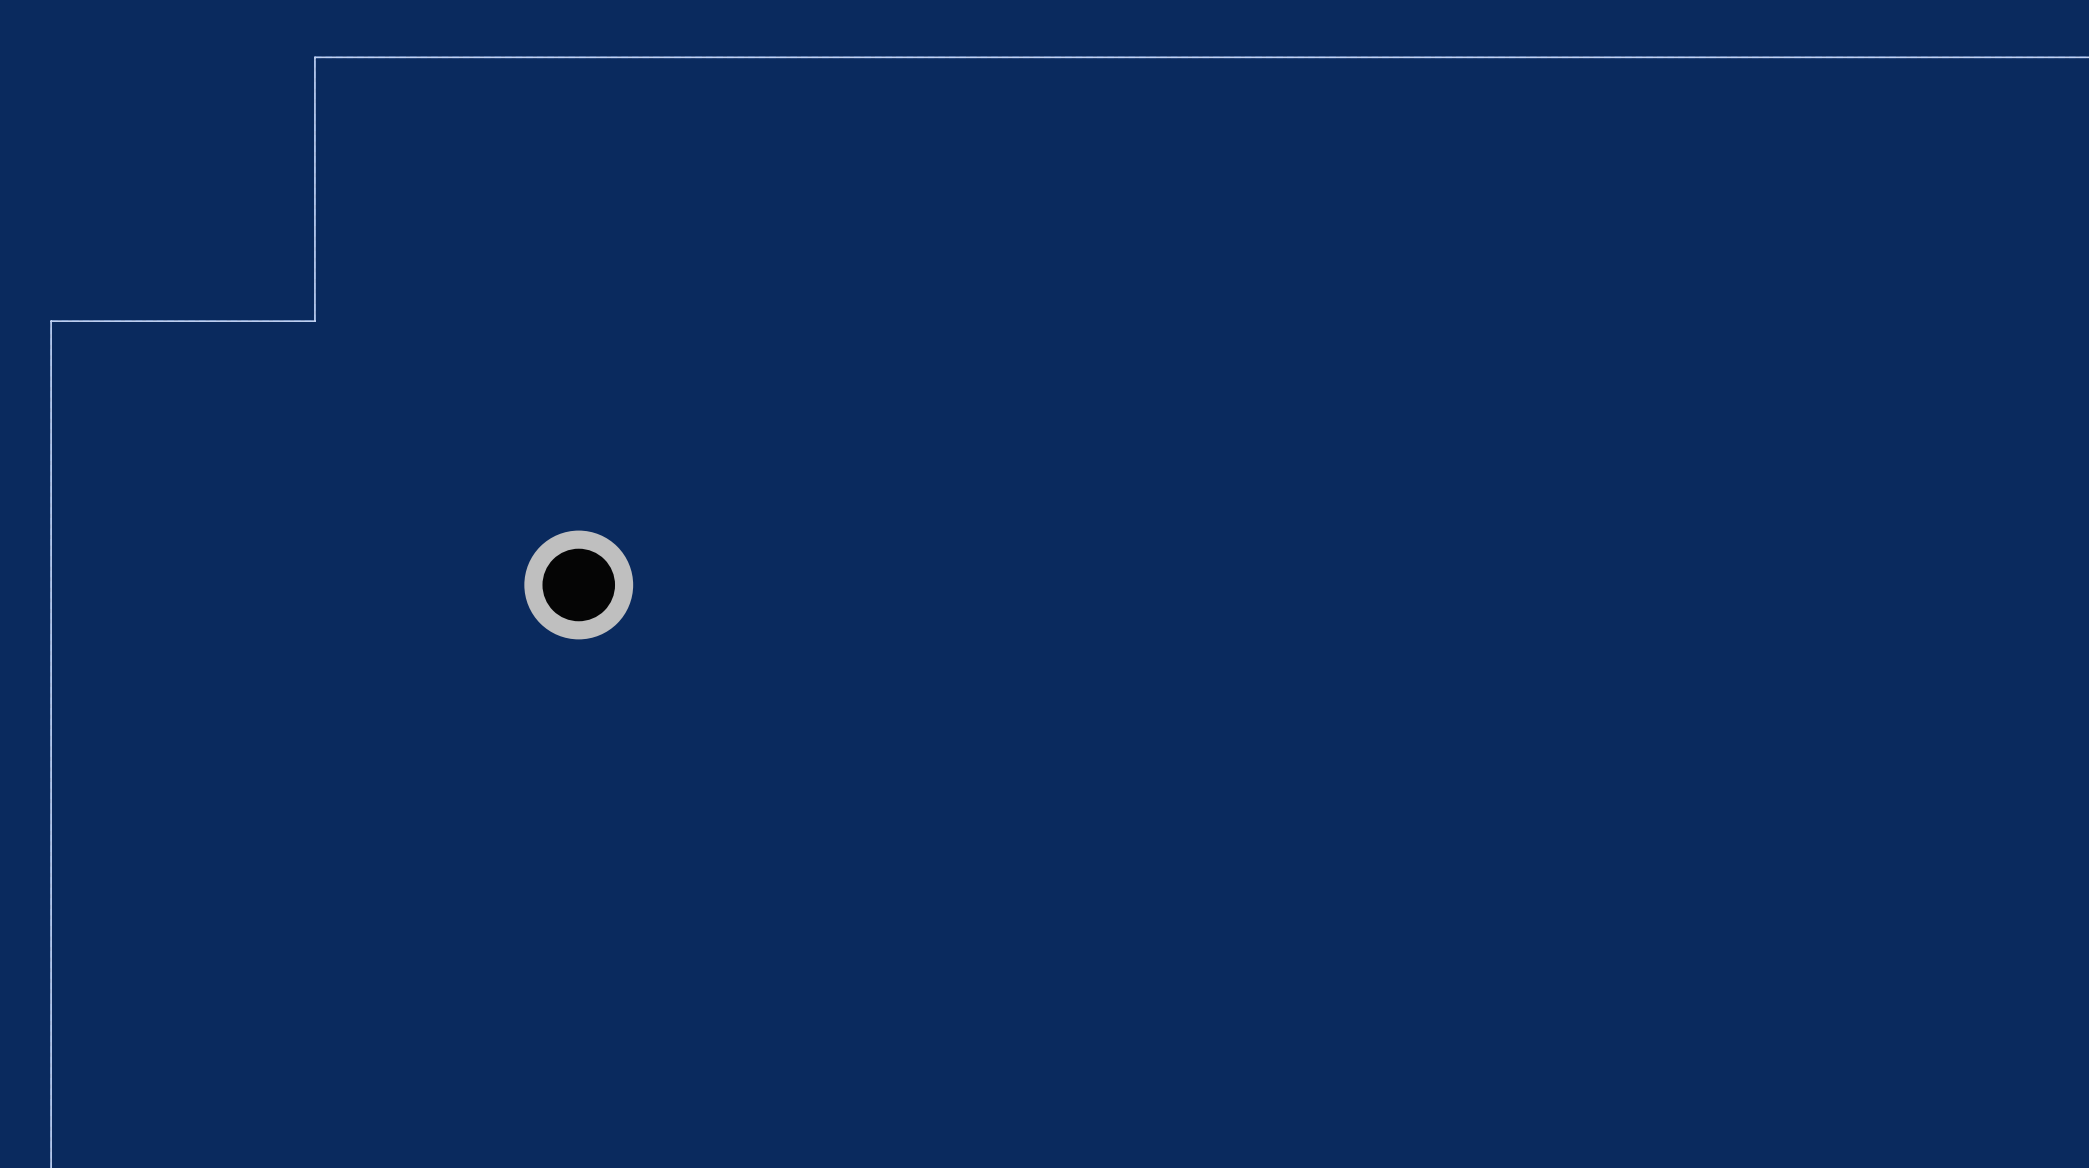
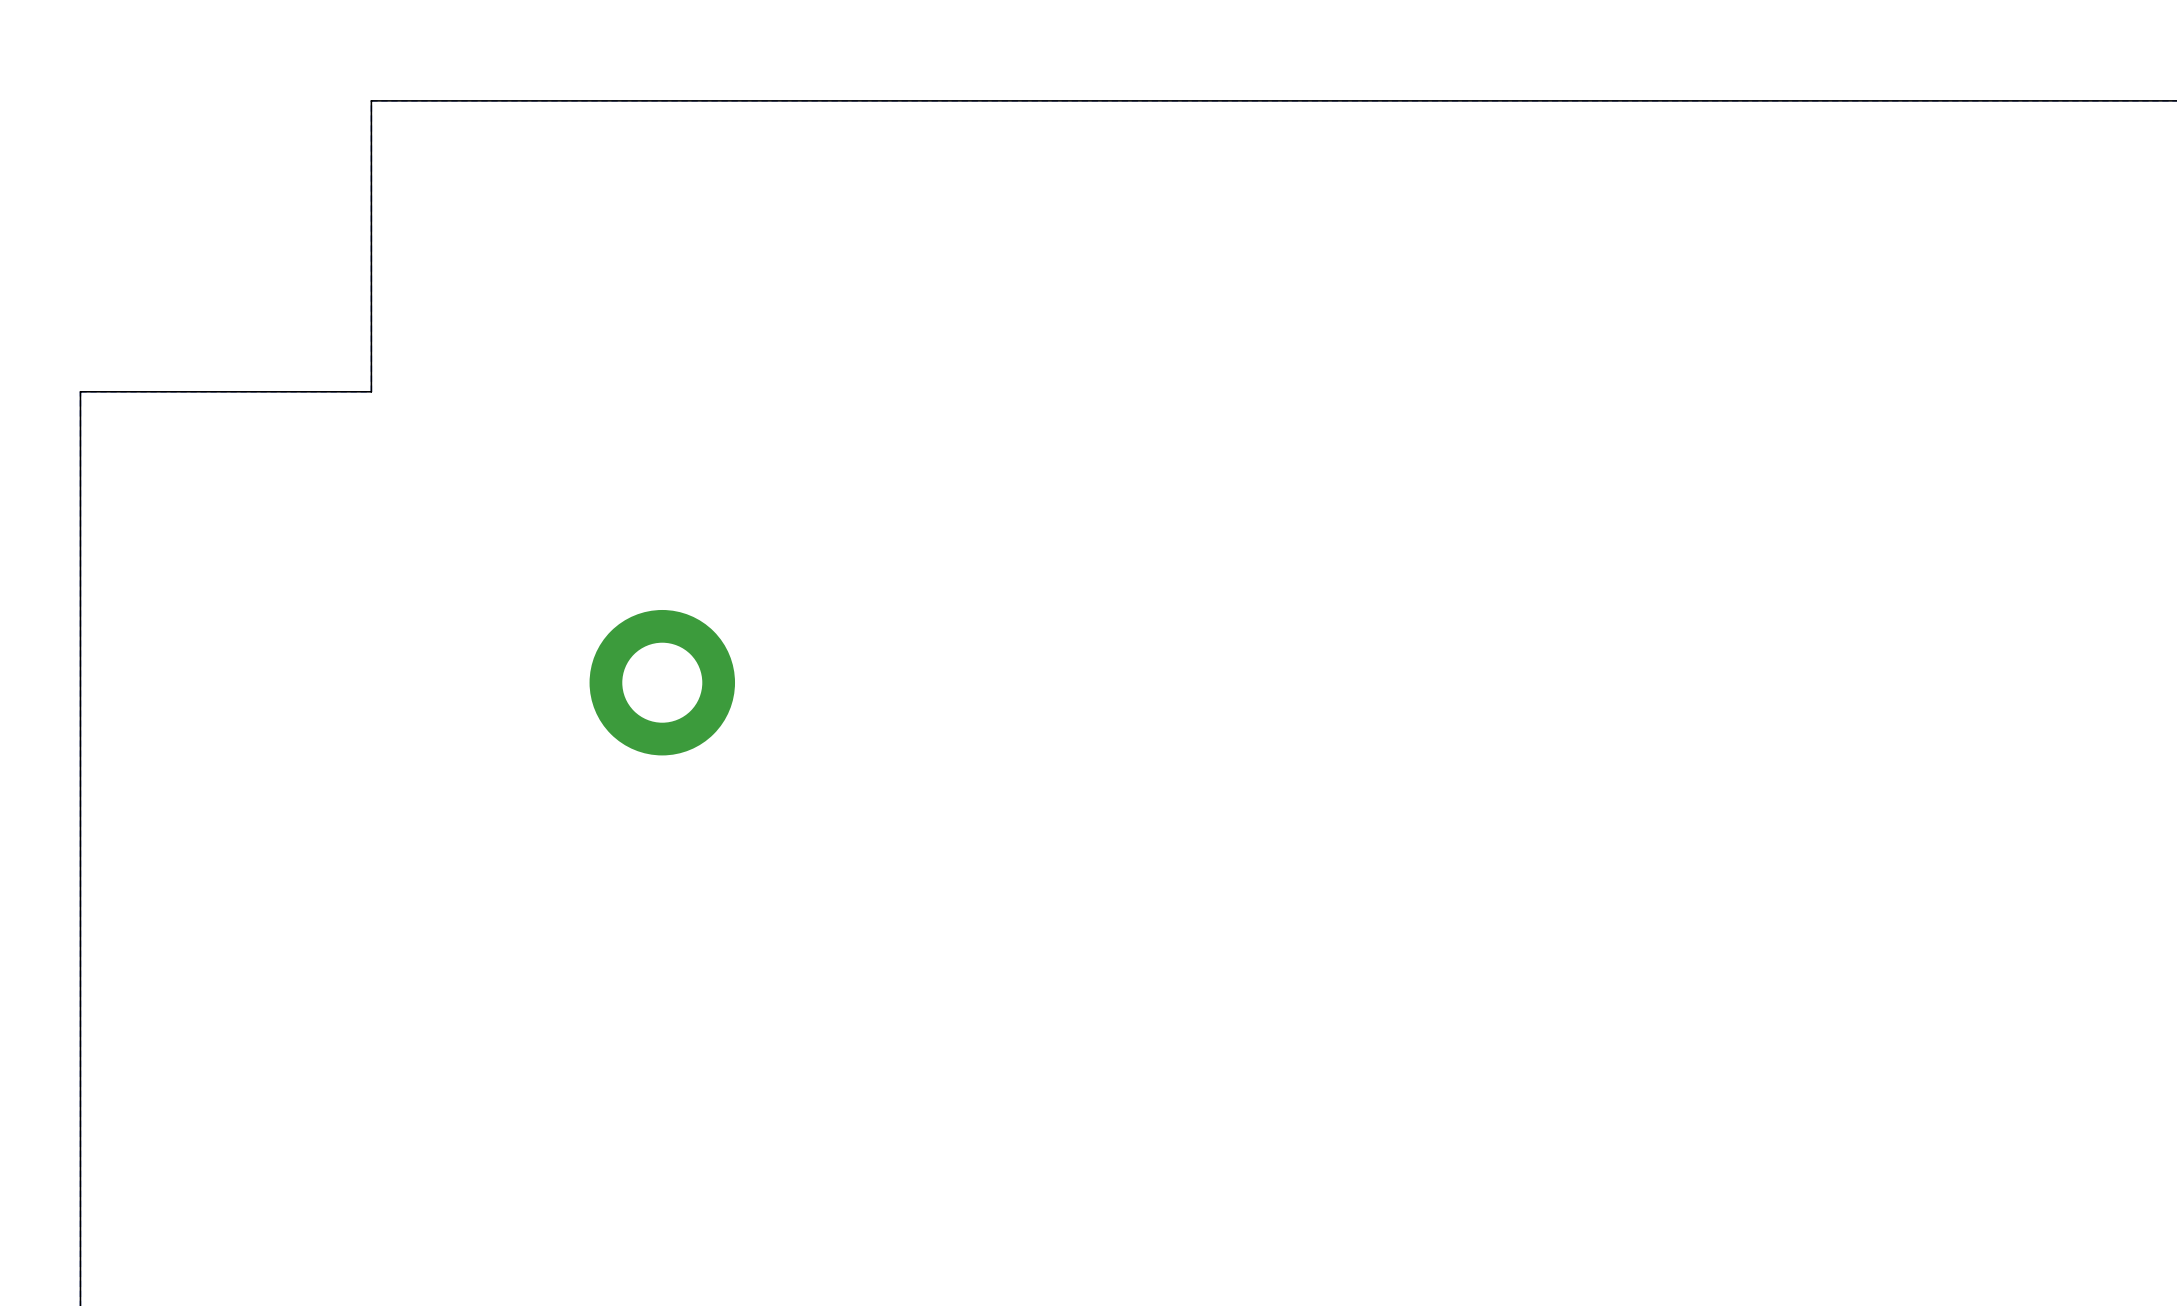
via size: [524, 530, 634, 640] -> [589, 609, 736, 756]

